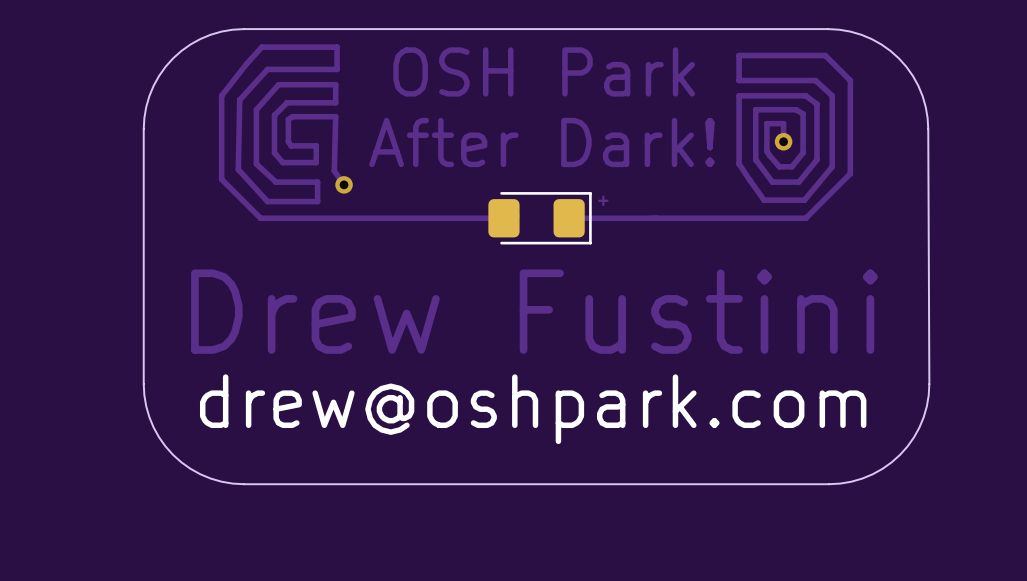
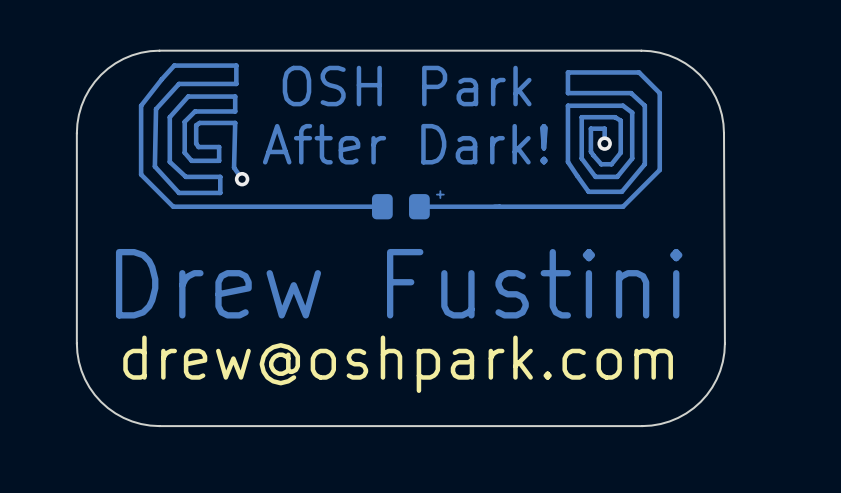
part footprint: [488, 192, 592, 245] -> [371, 194, 430, 220]

